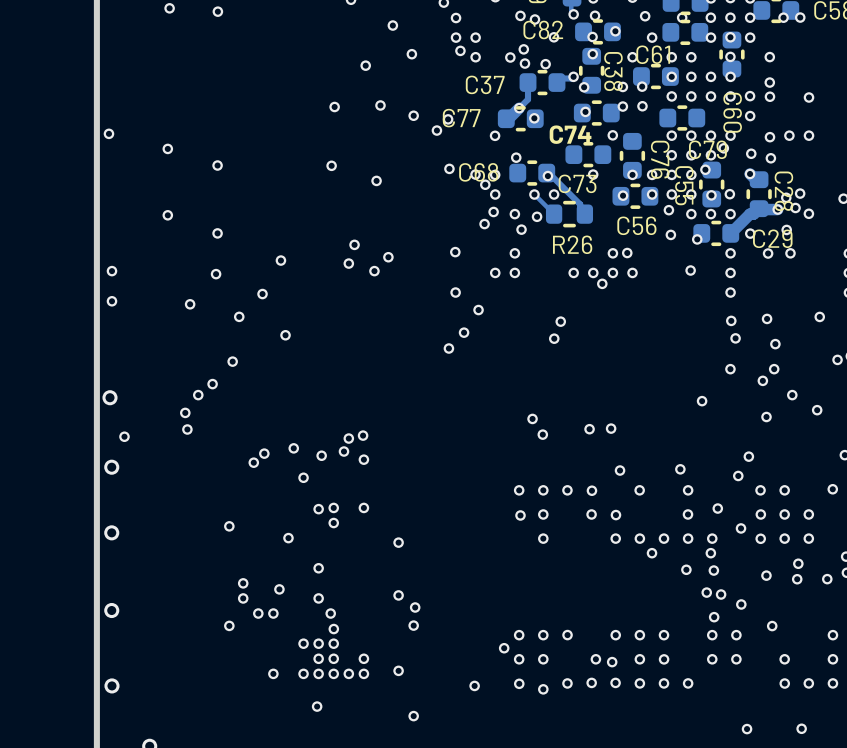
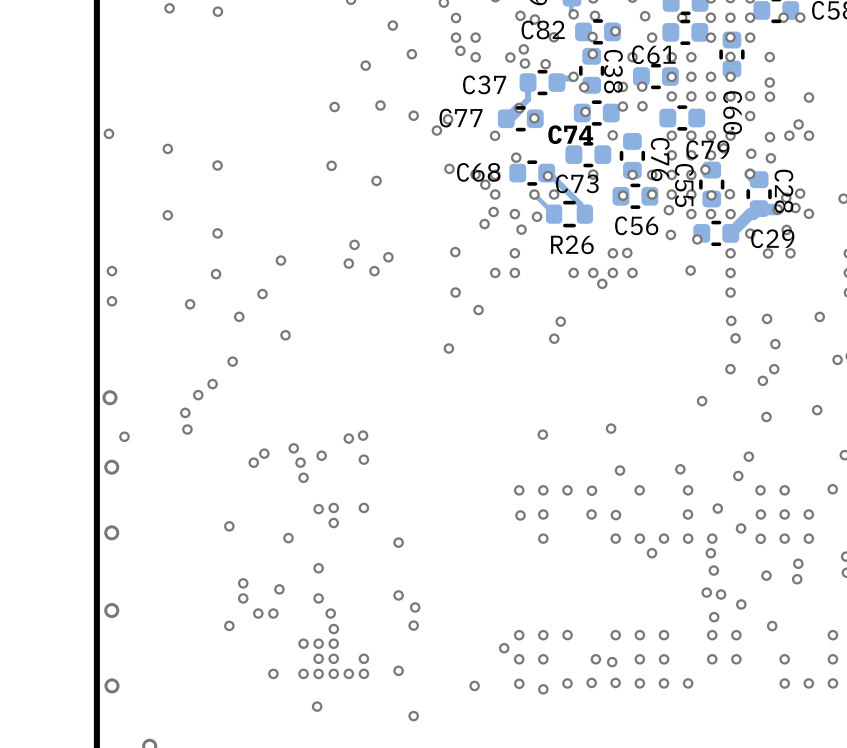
via: none -> (798, 124)
via: (464, 332) -> none
via: (792, 395) -> none
via: (532, 418) -> none
via: (589, 429) -> none
via position: (343, 451) -> (300, 462)
via: (686, 569) -> none
via: (827, 579) -> none
via: (801, 728) -> none
via: (747, 729) -> none

